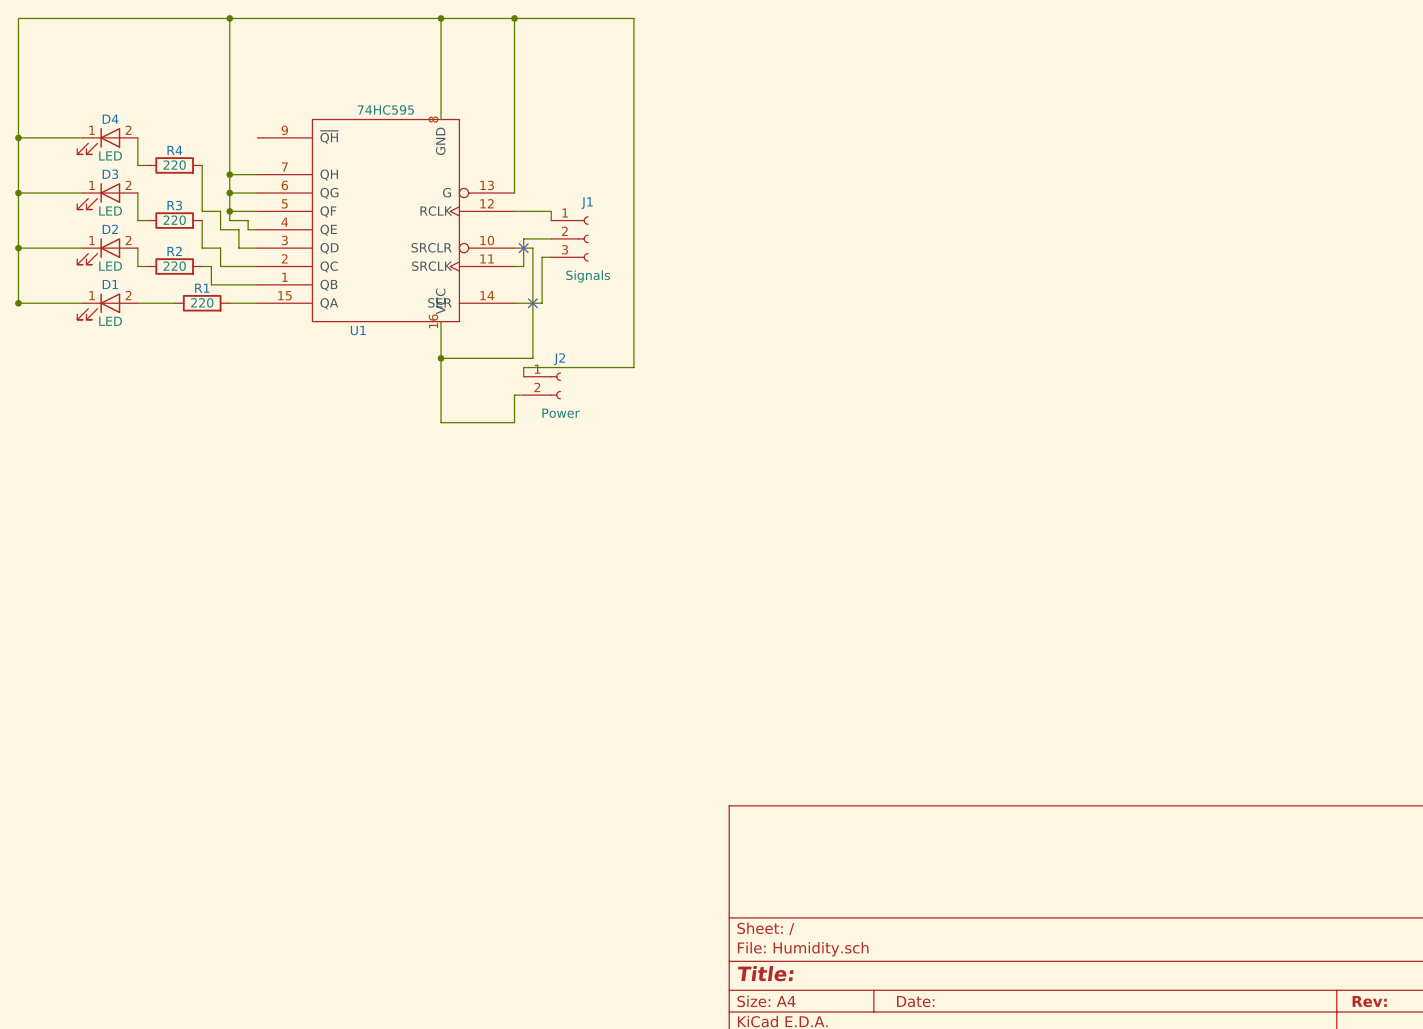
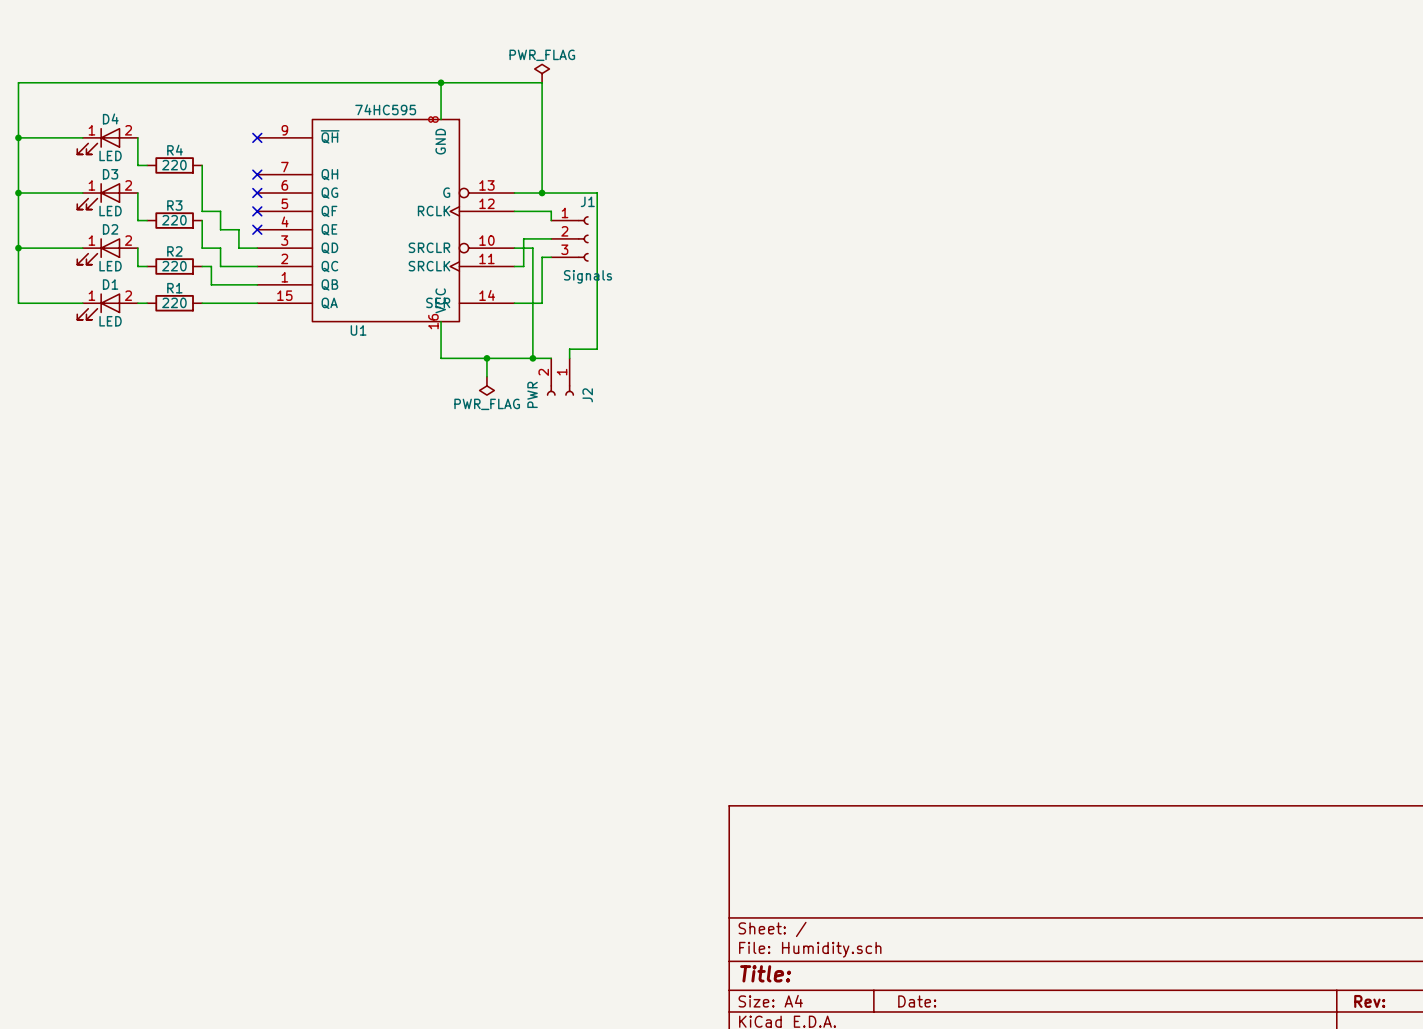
wire: (229, 18) (229, 220) (248, 220) (248, 229) (257, 229) -> none
junction: (229, 18) -> none
wire: (441, 18) (441, 82) -> none
junction: (441, 18) -> none
wire: (514, 18) (514, 193) -> (569, 358) (569, 349) (597, 349) (597, 193) (514, 193)
junction: (514, 18) -> none
power symbol: none -> PWR_FLAG (542, 73)
wire: (18, 82) (18, 18) (633, 18) (633, 367) (523, 367) (523, 376) -> (18, 82) (542, 82) (542, 193)
junction: none -> (441, 82)
no-connect mark: none -> (257, 137)
wire: (229, 174) (257, 174) -> none
junction: (229, 174) -> none
no-connect mark: none -> (257, 174)
wire: (229, 193) (257, 193) -> none
junction: (229, 193) -> none
no-connect mark: none -> (257, 193)
junction: none -> (542, 193)
wire: (229, 211) (257, 211) -> none
junction: (229, 211) -> none
no-connect mark: none -> (257, 211)
no-connect mark: none -> (257, 229)
no-connect mark: (523, 248) -> none
junction: (18, 303) -> none
wire: (147, 303) (174, 303) -> (202, 303) (229, 303)
R1 position: (202, 303) -> (174, 303)
no-connect mark: (532, 303) -> none
wire: (441, 358) (441, 422) (514, 422) (514, 395) (523, 395) -> none
junction: (441, 358) -> none
wire: none -> (486, 358) (486, 376)
junction: none -> (486, 358)
wire: none -> (532, 358) (551, 358)
junction: none -> (532, 358)
power symbol: none -> PWR_FLAG (486, 385)
J2 rotation: 0° (555, 385) -> 90° clockwise (560, 390)
J2 value: Power (561, 413) -> PWR (532, 394)

